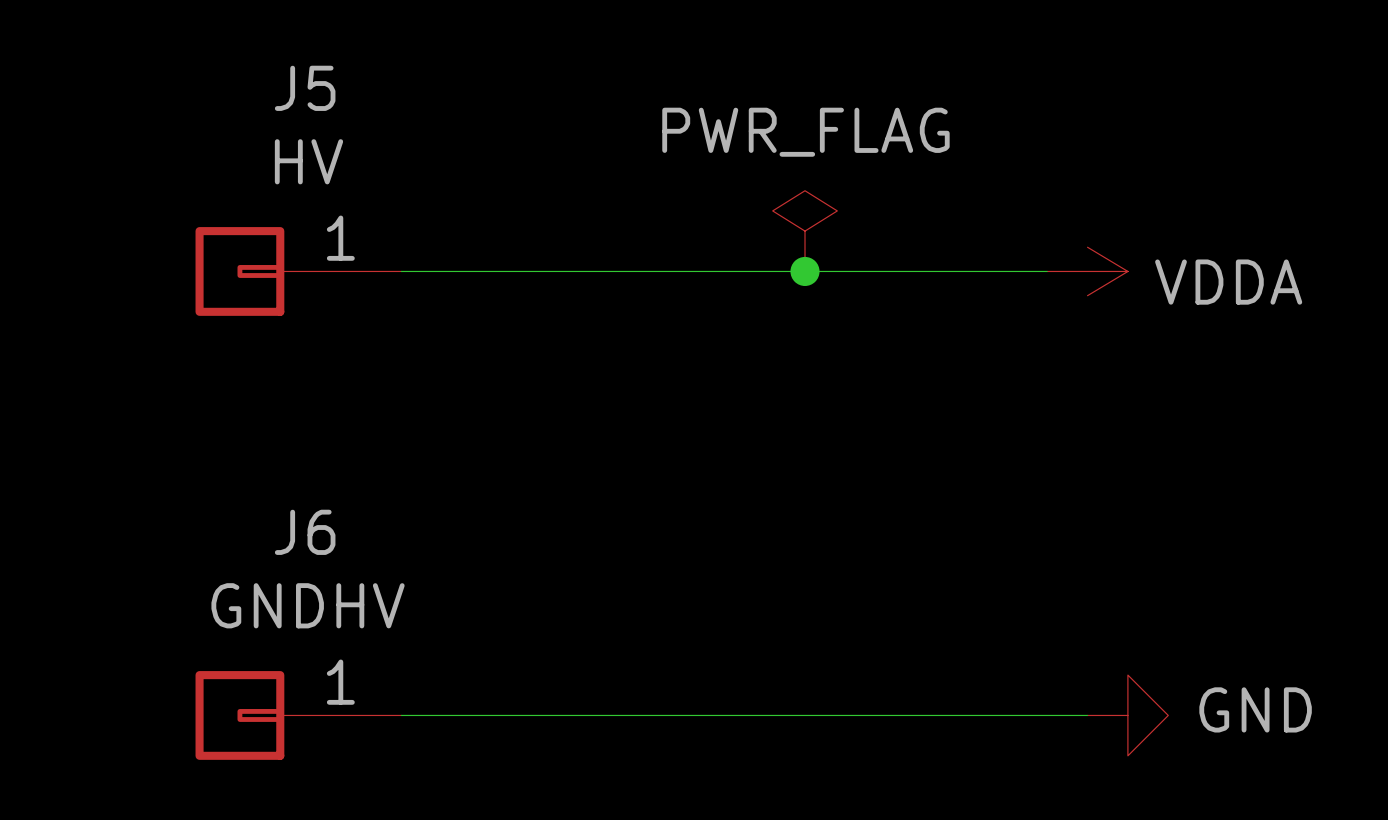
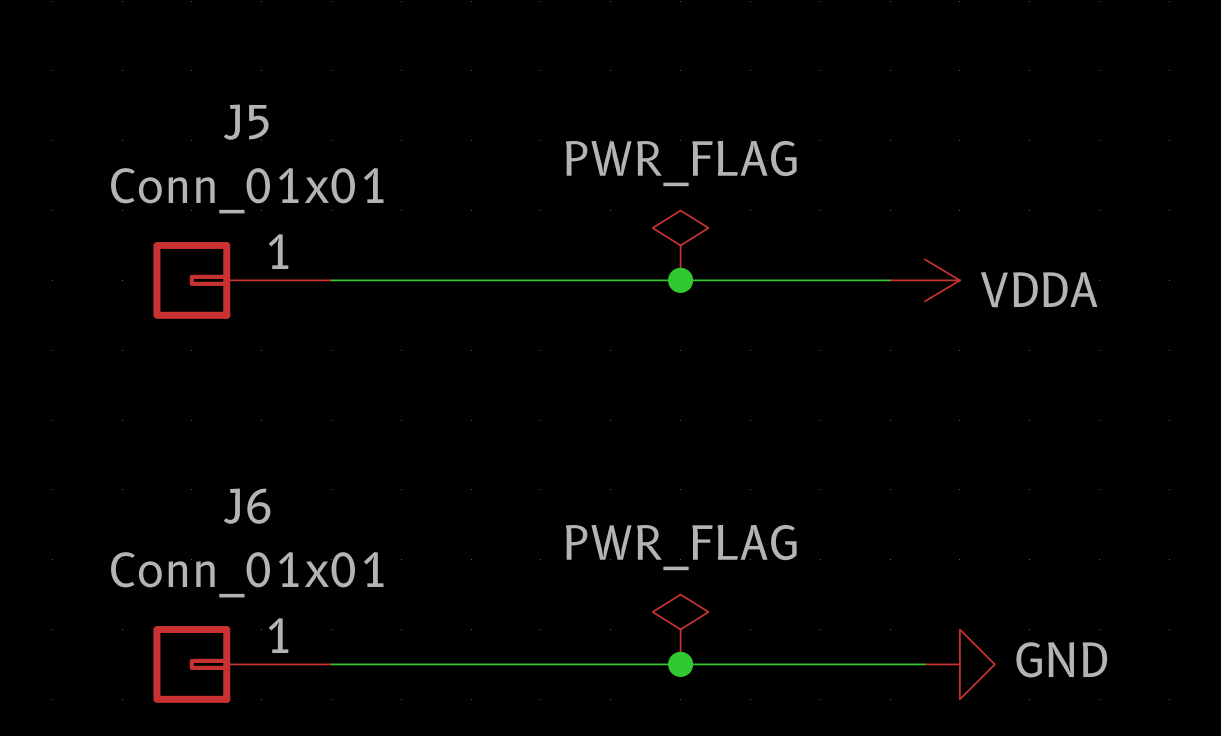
J5 value: HV (309, 161) -> Conn_01x01 (247, 190)
J6 value: GNDHV (308, 605) -> Conn_01x01 (247, 574)
power symbol: none -> PWR_FLAG (680, 629)
junction: none -> (680, 664)

